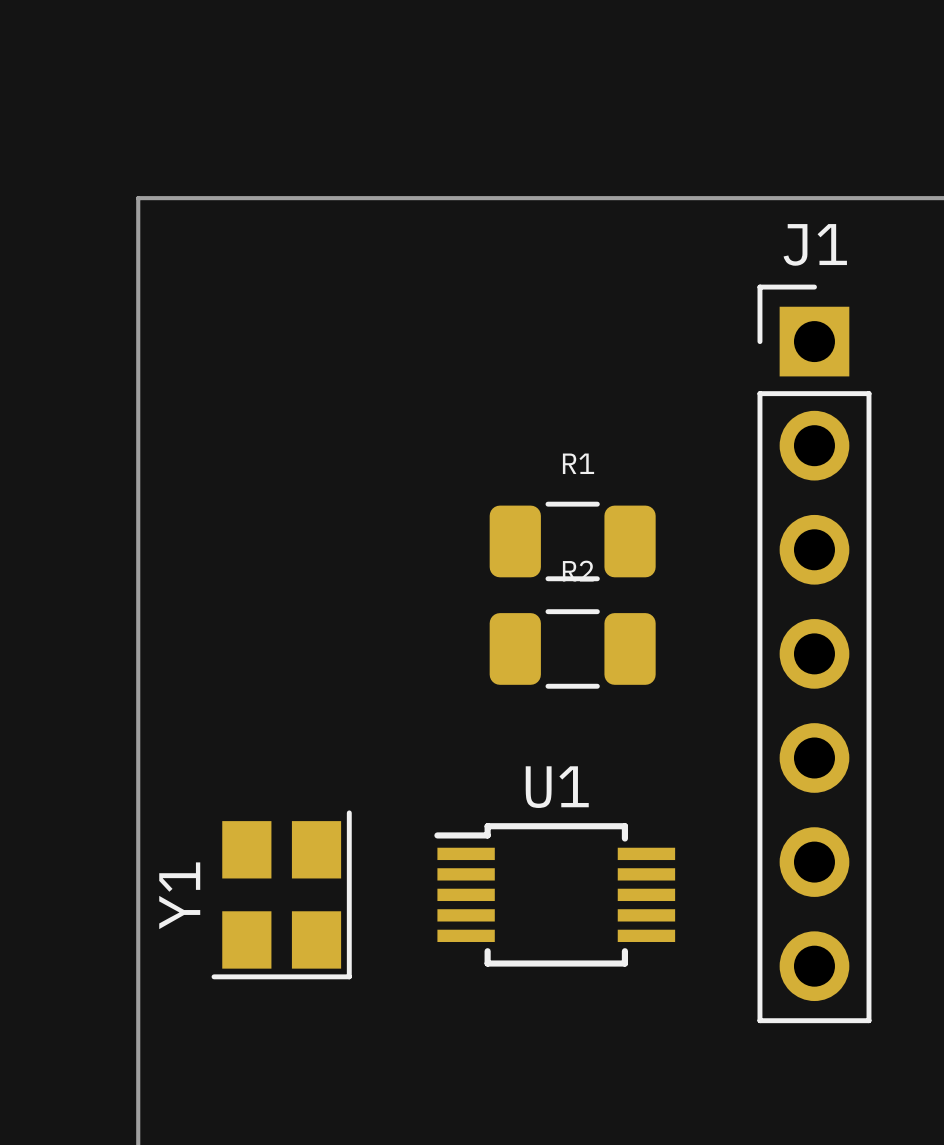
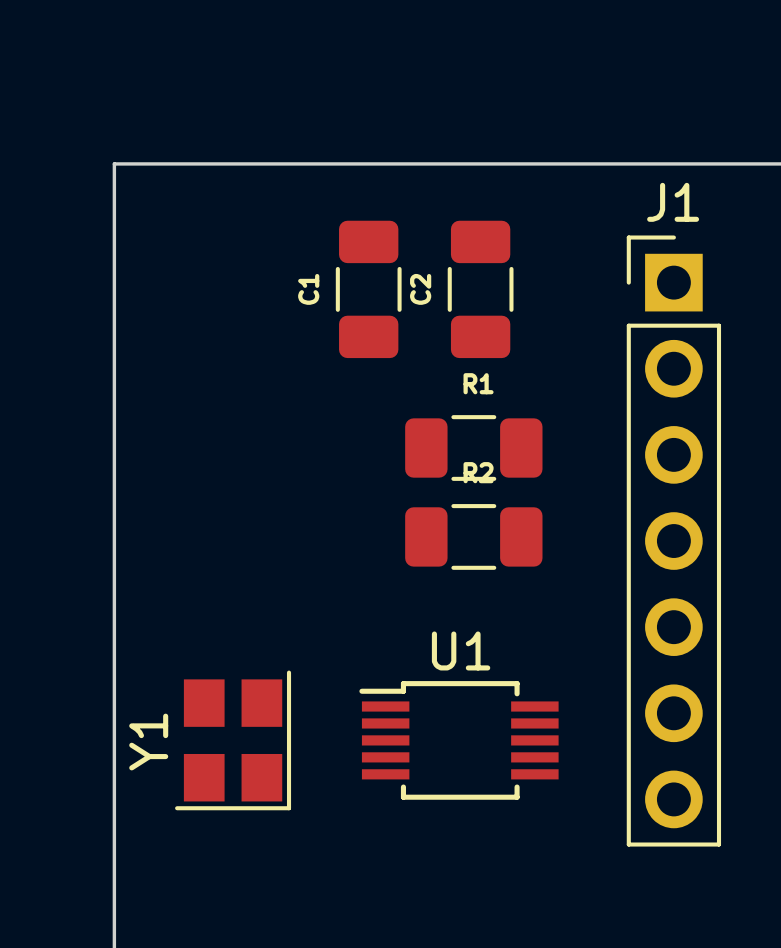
C1: none -> (368, 289)
C2: none -> (480, 289)

